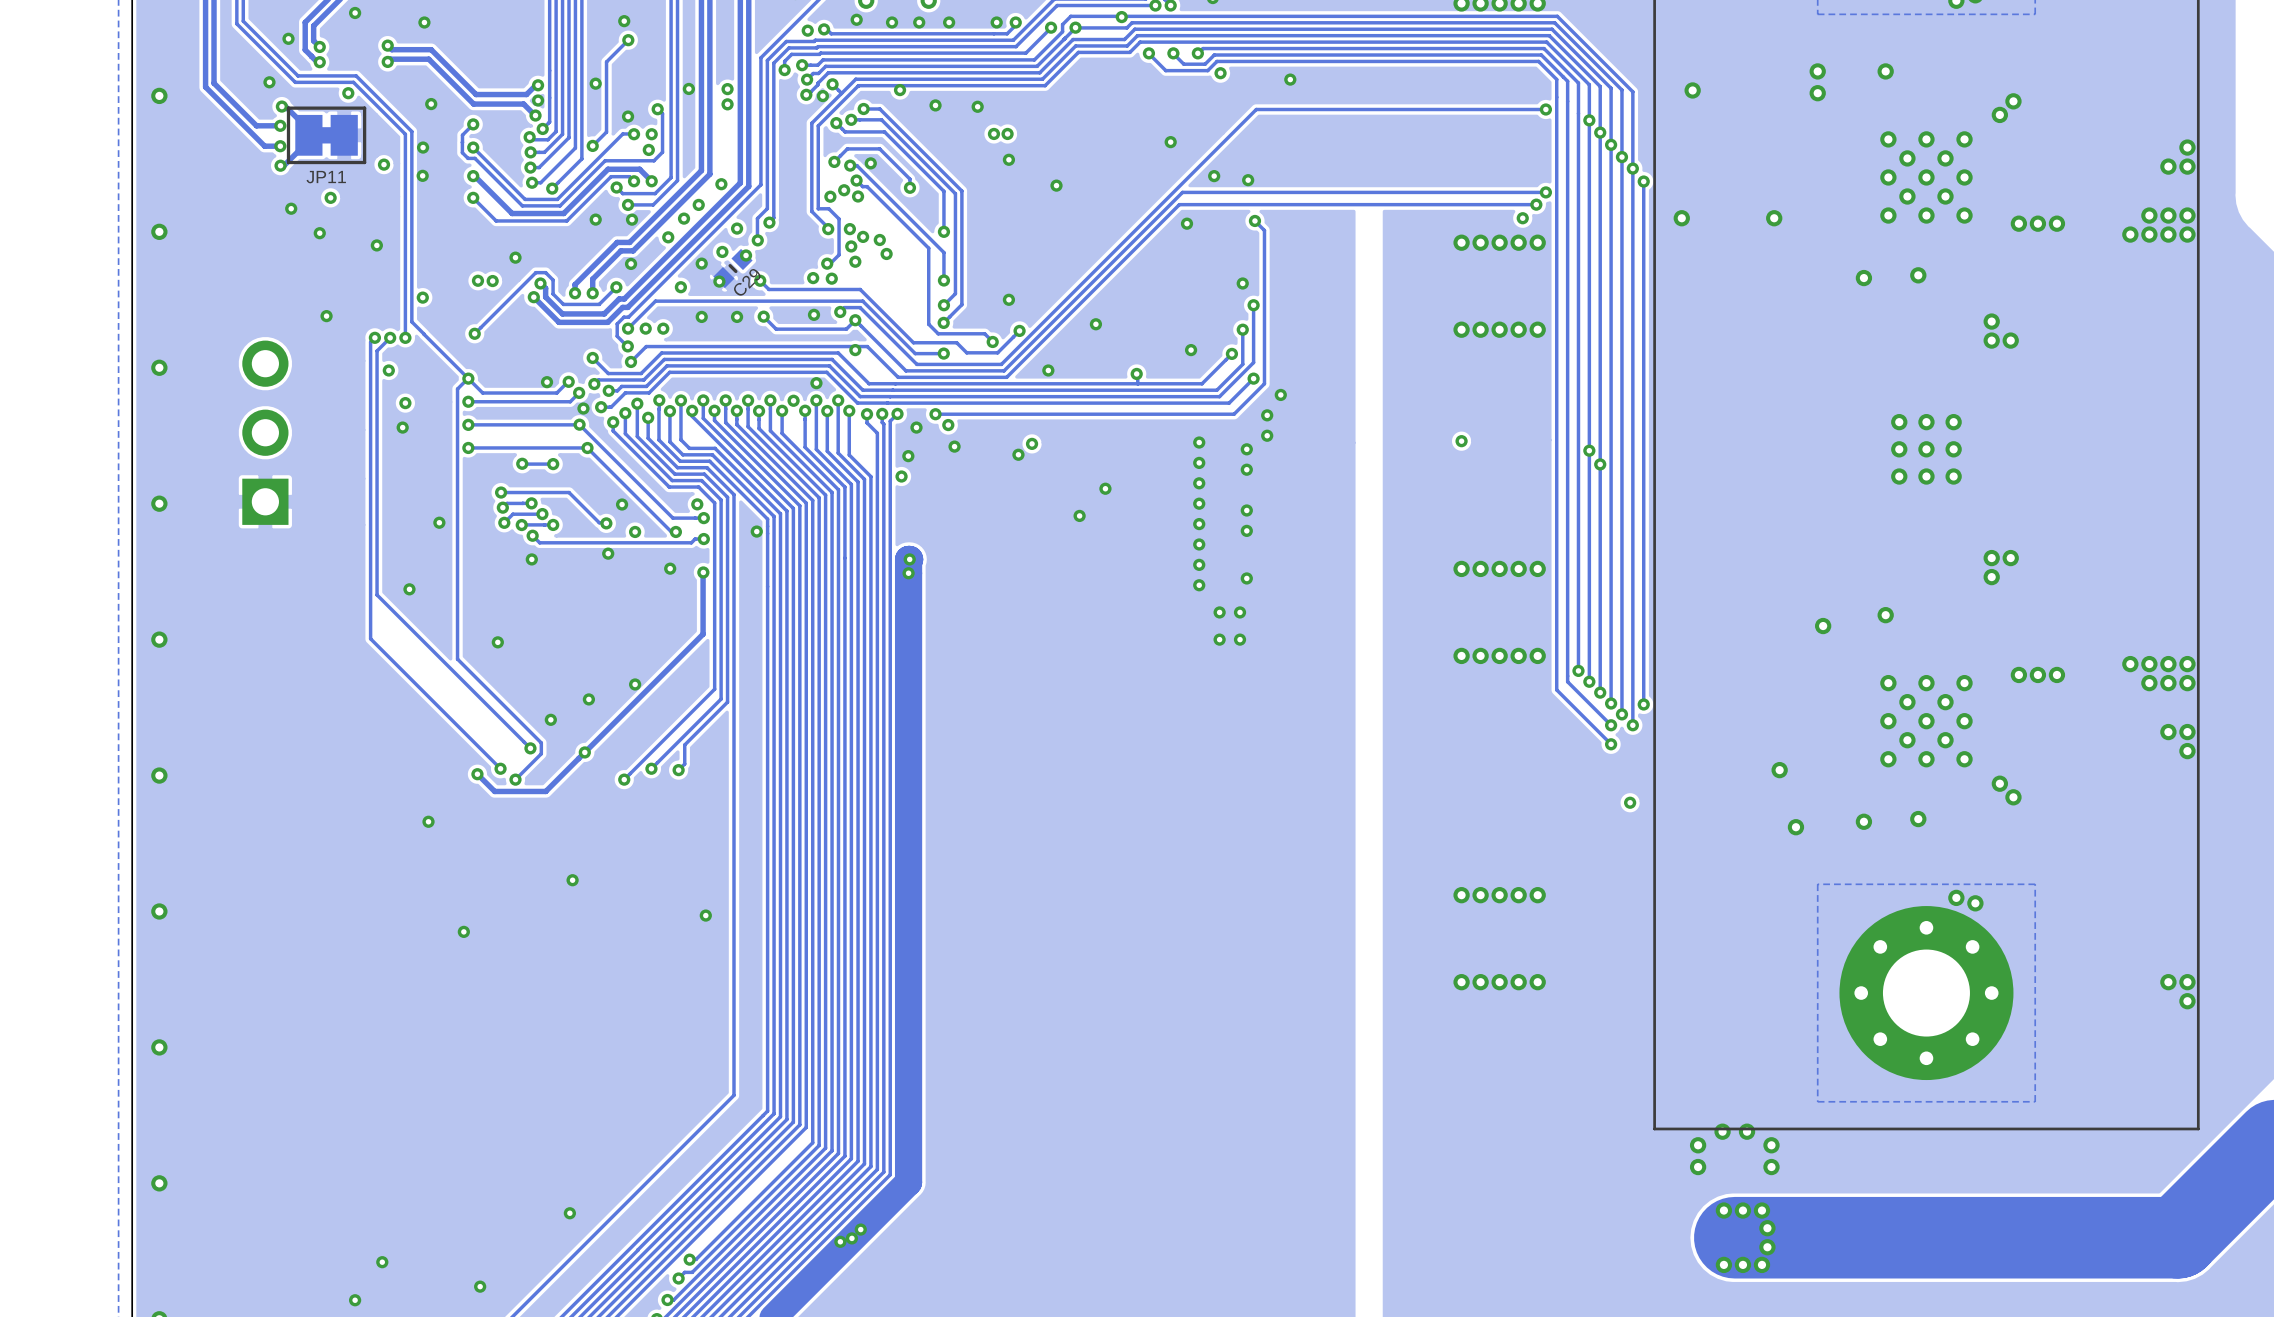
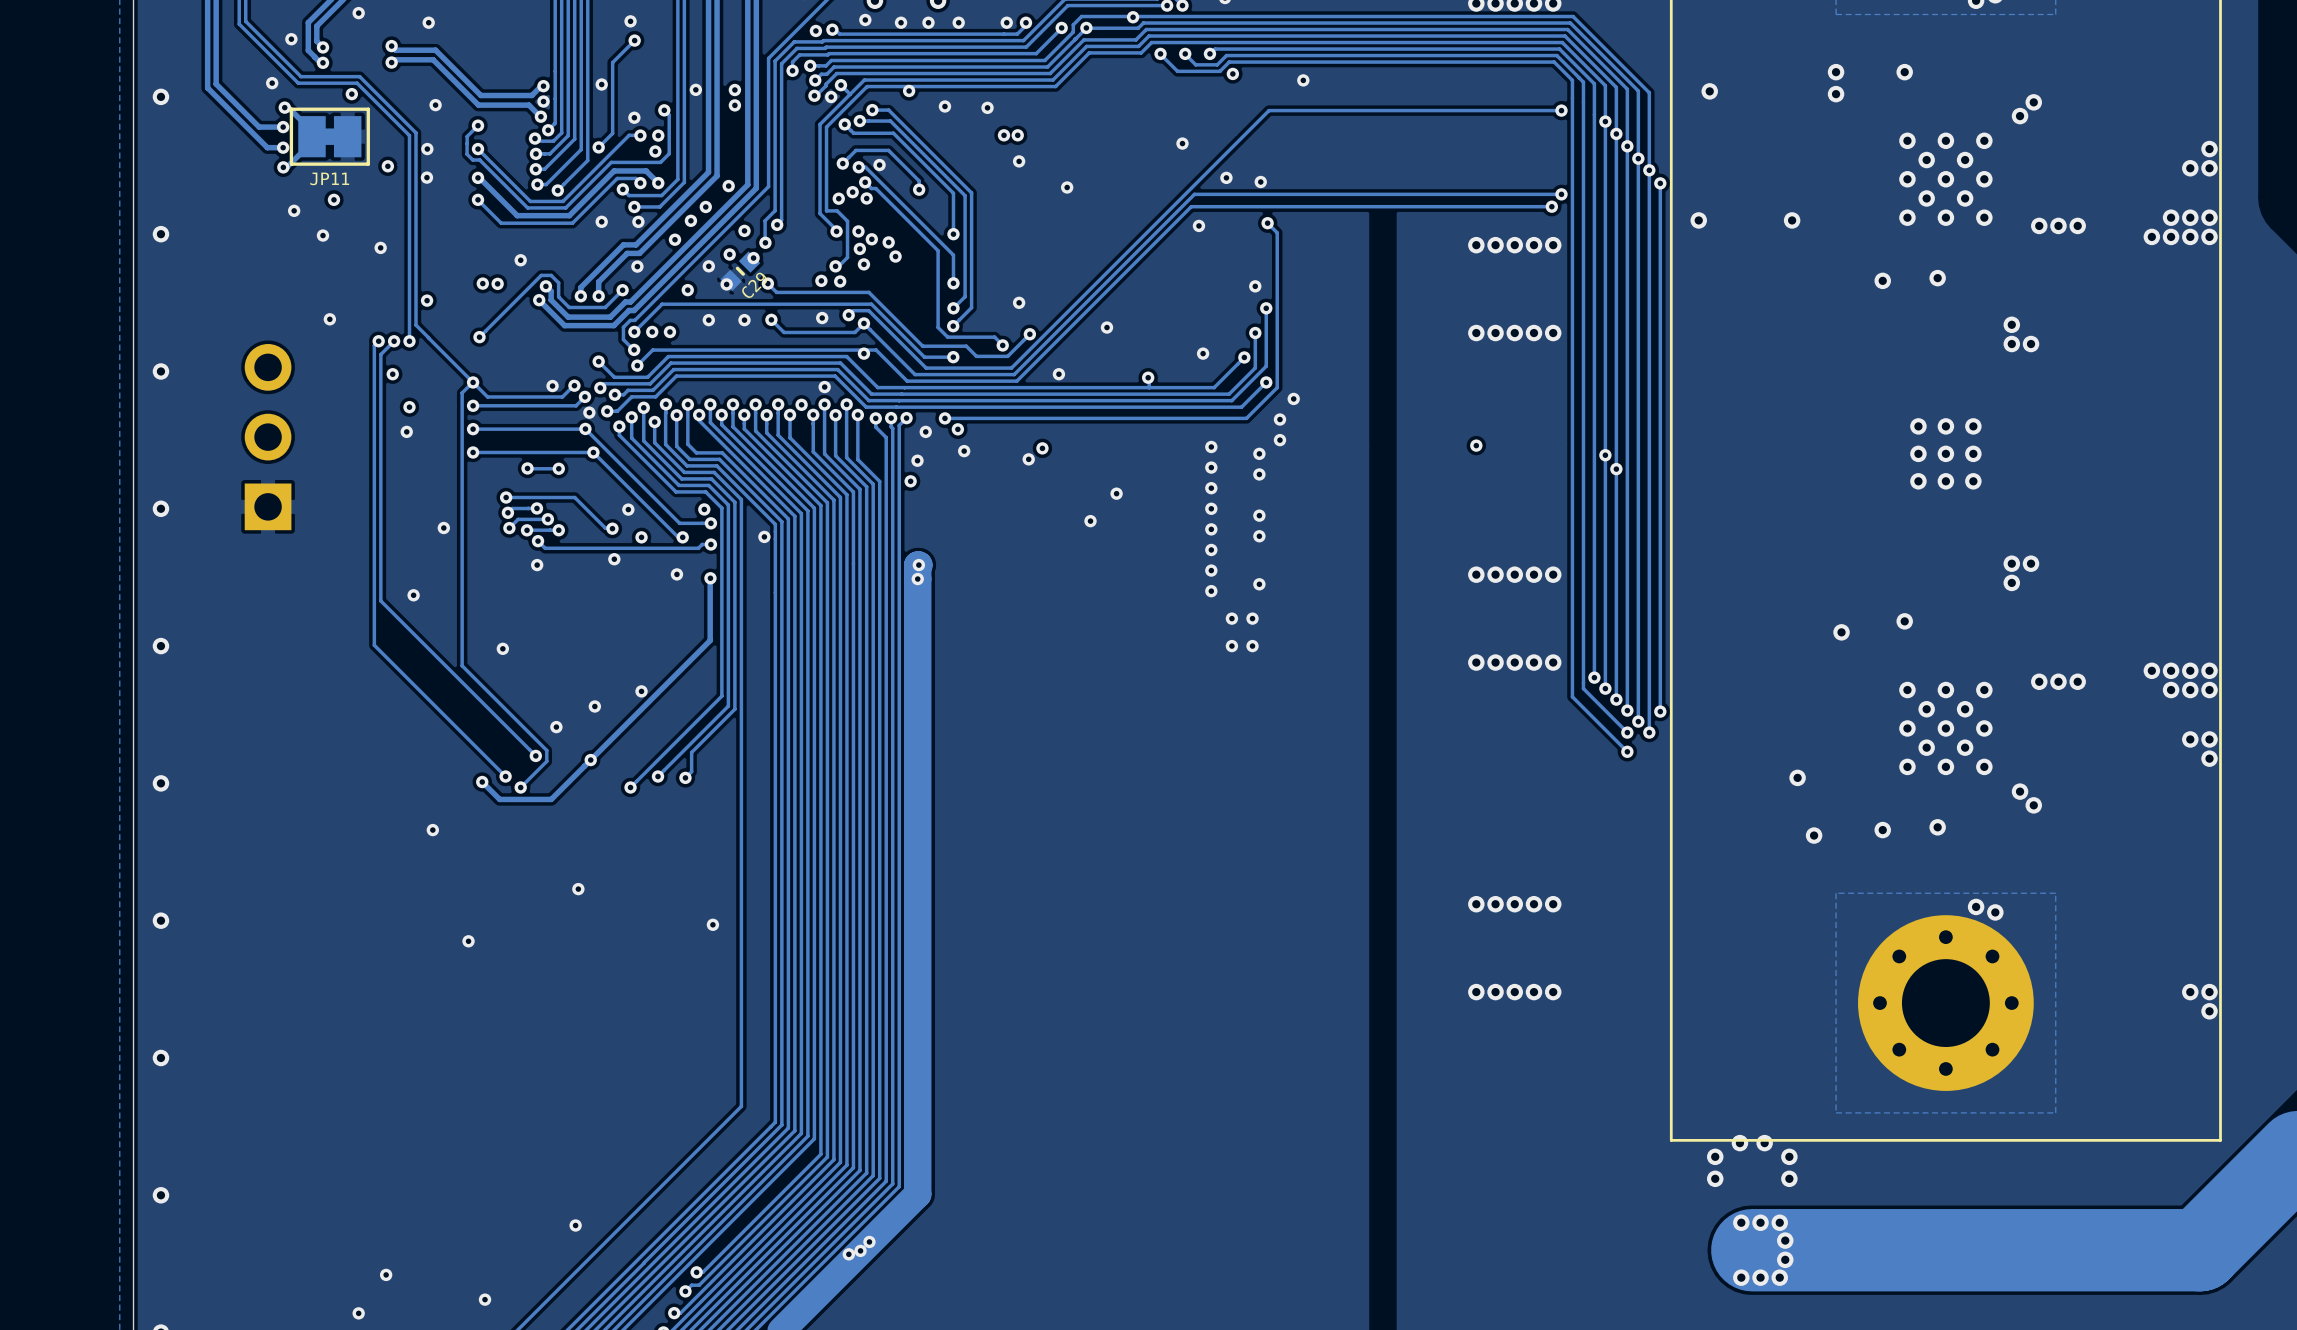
via: (1522, 218) -> none
via: (1630, 802) -> none

